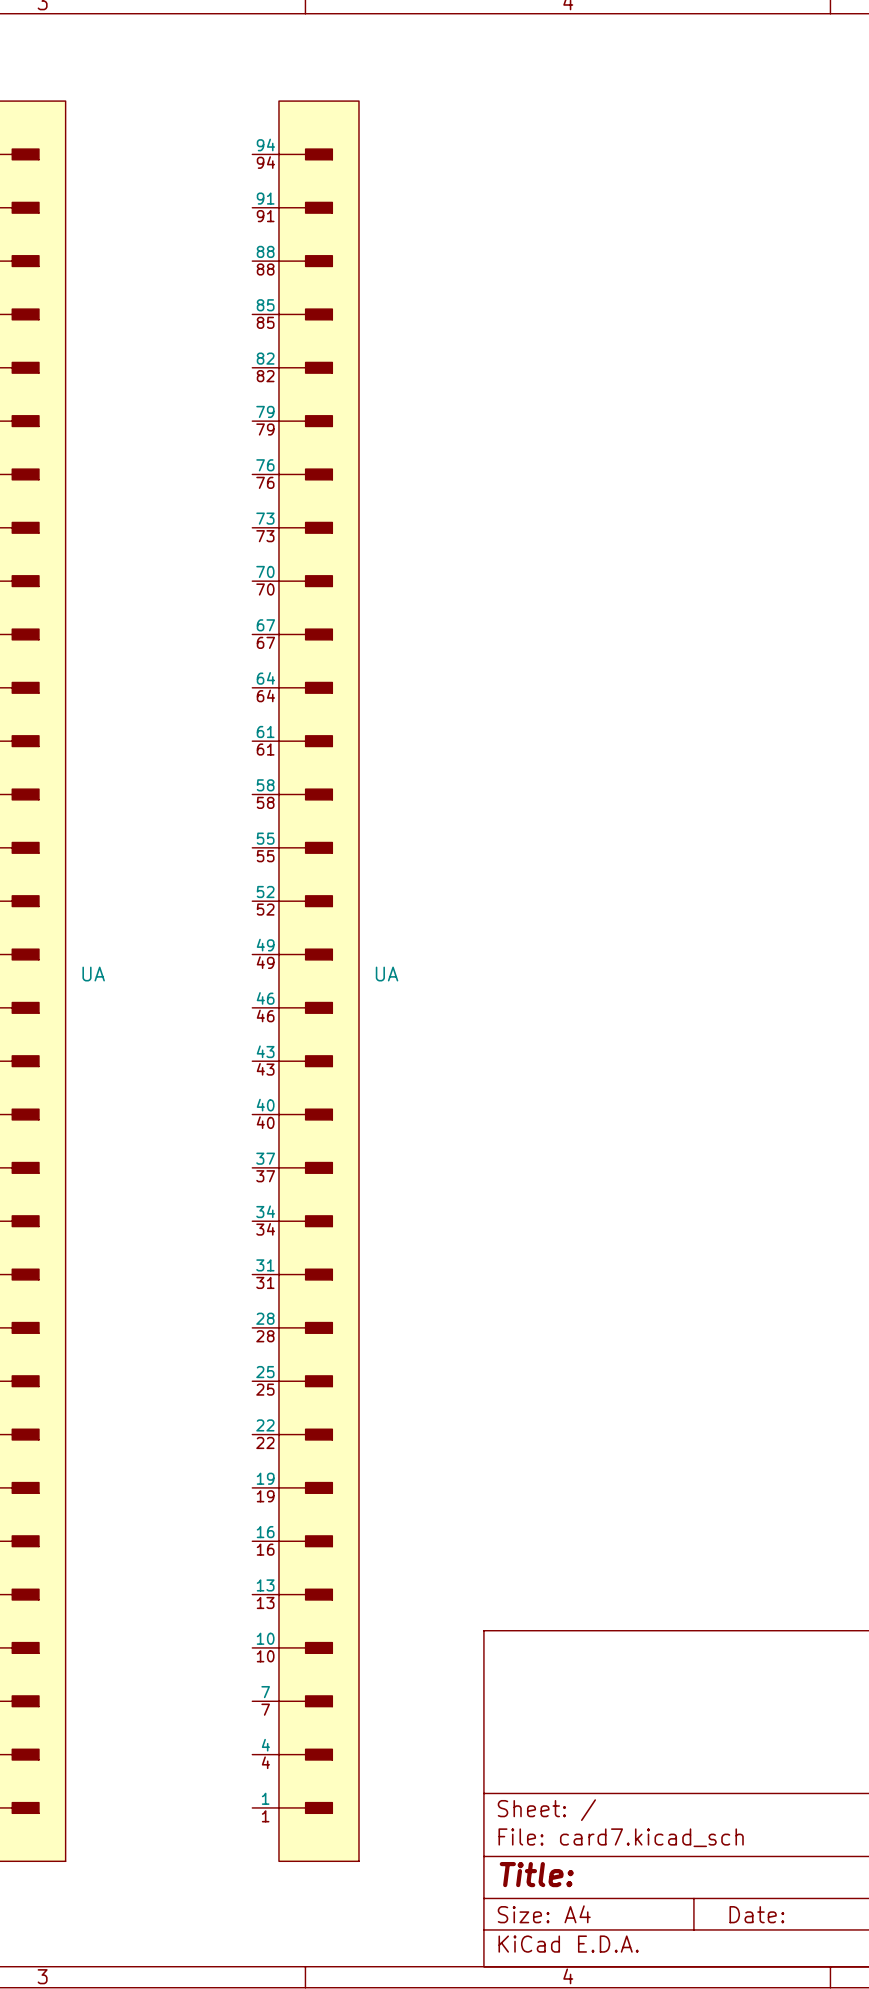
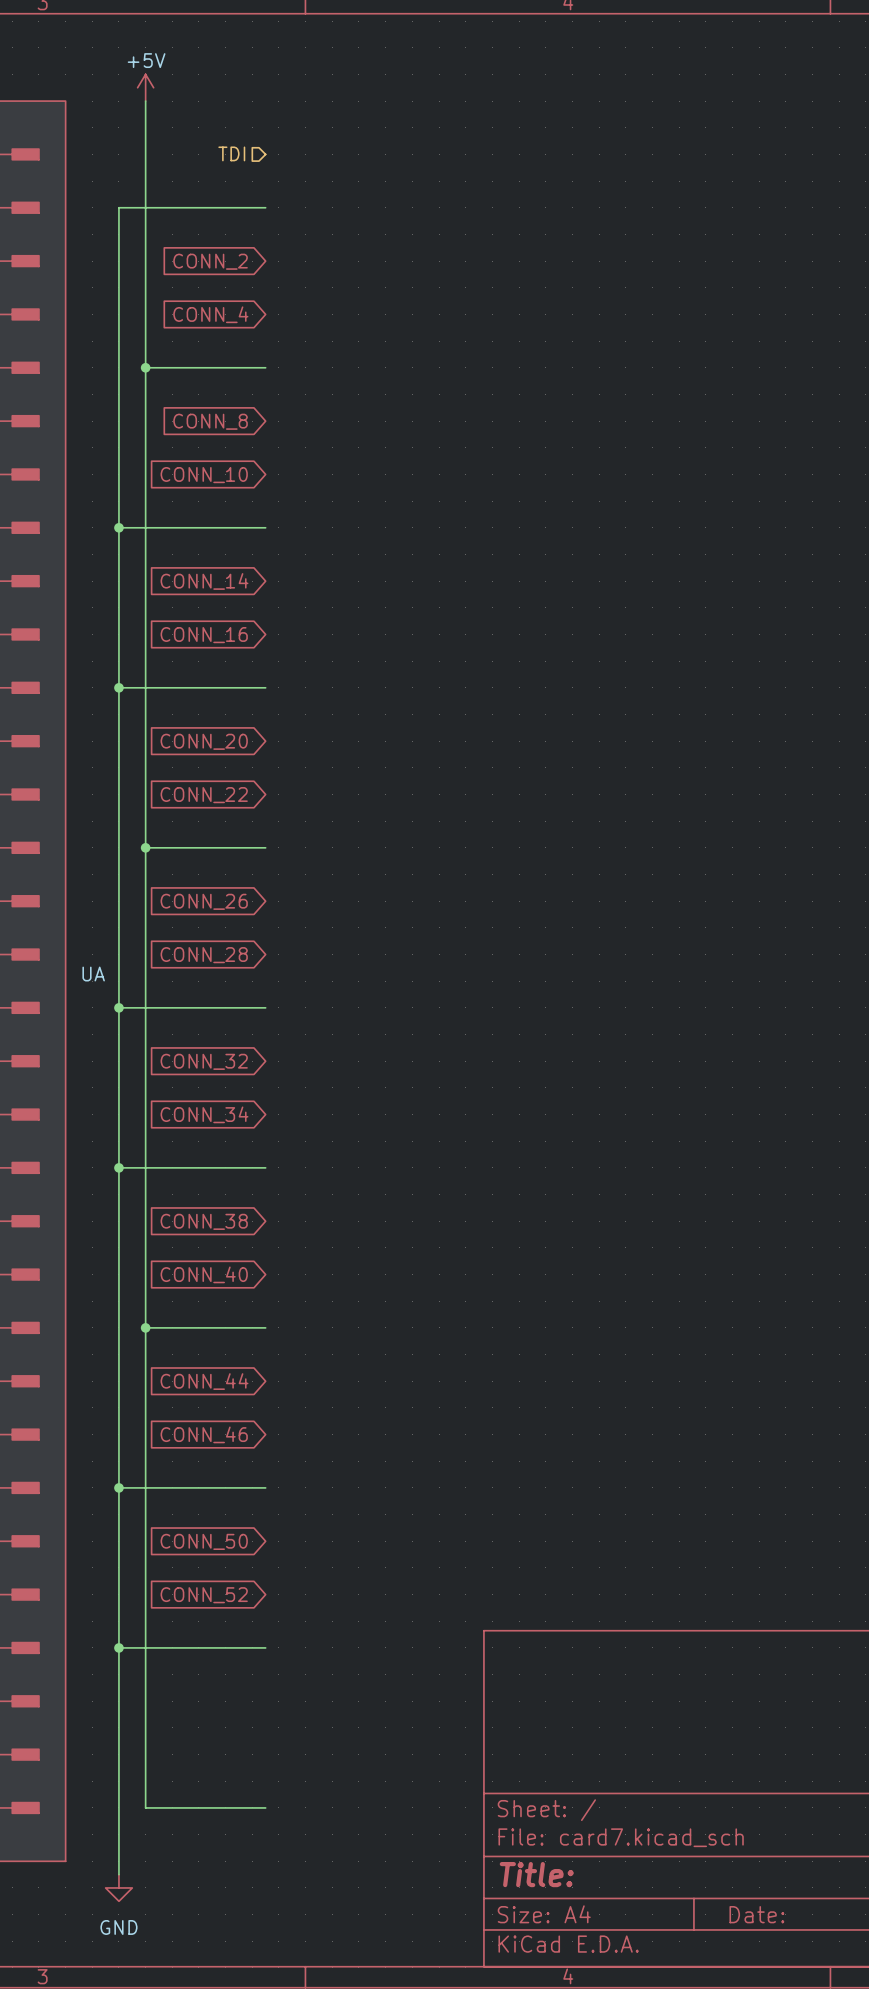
power symbol: none -> +5V (145, 87)
wire: none -> (145, 101) (145, 1807) (265, 1807)
hierarchical label: none -> TDI (231, 153)
wire: none -> (265, 207) (118, 207) (118, 1874)
global label: none -> CONN_2 (210, 261)
global label: none -> CONN_4 (210, 314)
wire: none -> (145, 367) (265, 367)
junction: none -> (145, 367)
global label: none -> CONN_8 (210, 421)
global label: none -> CONN_10 (204, 475)
wire: none -> (118, 527) (265, 527)
junction: none -> (118, 527)
global label: none -> CONN_14 (204, 581)
global label: none -> CONN_16 (204, 635)
wire: none -> (118, 687) (265, 687)
junction: none -> (118, 687)
global label: none -> CONN_20 (204, 741)
global label: none -> CONN_22 (204, 795)
wire: none -> (145, 847) (265, 847)
junction: none -> (145, 847)
global label: none -> CONN_26 (204, 901)
global label: none -> CONN_28 (204, 955)
UA: (305, 981) -> none
wire: none -> (118, 1007) (265, 1007)
junction: none -> (118, 1007)
global label: none -> CONN_32 (204, 1061)
global label: none -> CONN_34 (204, 1114)
wire: none -> (118, 1167) (265, 1167)
junction: none -> (118, 1167)
global label: none -> CONN_38 (204, 1221)
global label: none -> CONN_40 (204, 1274)
wire: none -> (145, 1327) (265, 1327)
junction: none -> (145, 1327)
global label: none -> CONN_44 (204, 1381)
global label: none -> CONN_46 (204, 1434)
wire: none -> (118, 1487) (265, 1487)
junction: none -> (118, 1487)
global label: none -> CONN_50 (204, 1541)
global label: none -> CONN_52 (204, 1595)
wire: none -> (118, 1647) (265, 1647)
junction: none -> (118, 1647)
power symbol: none -> GND (118, 1887)

